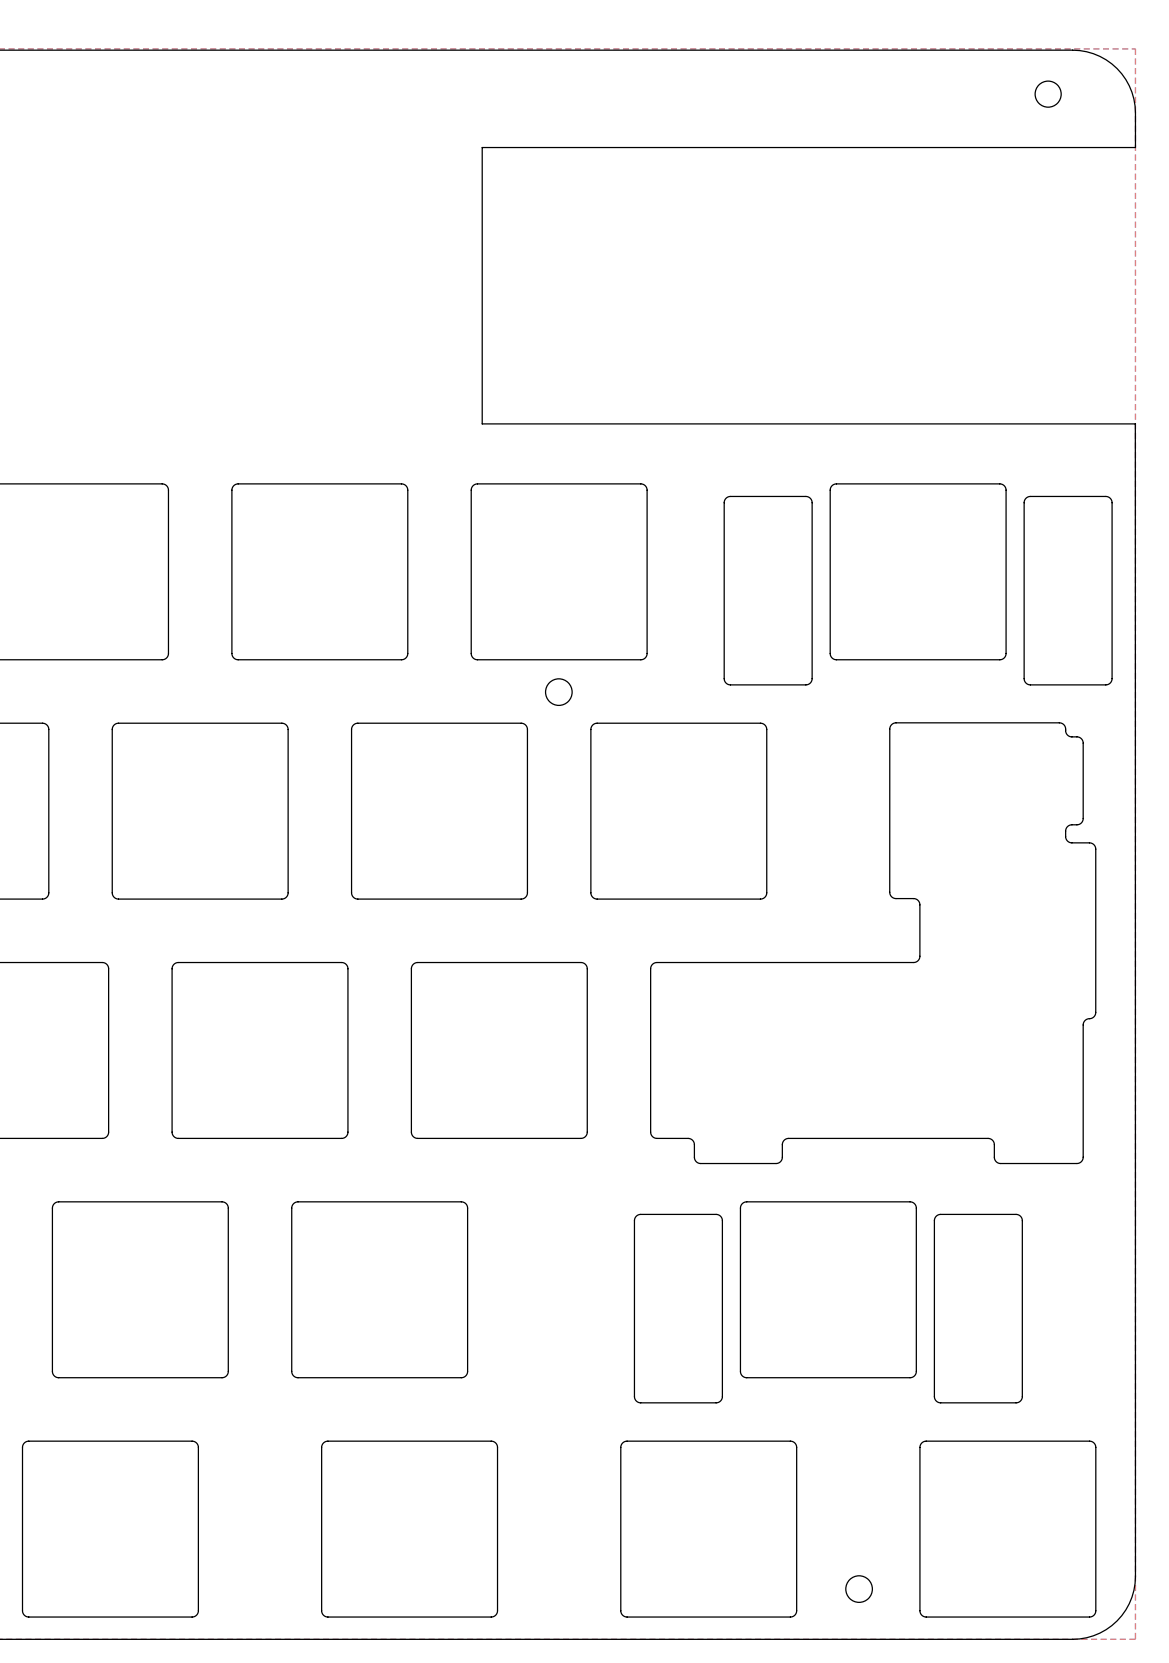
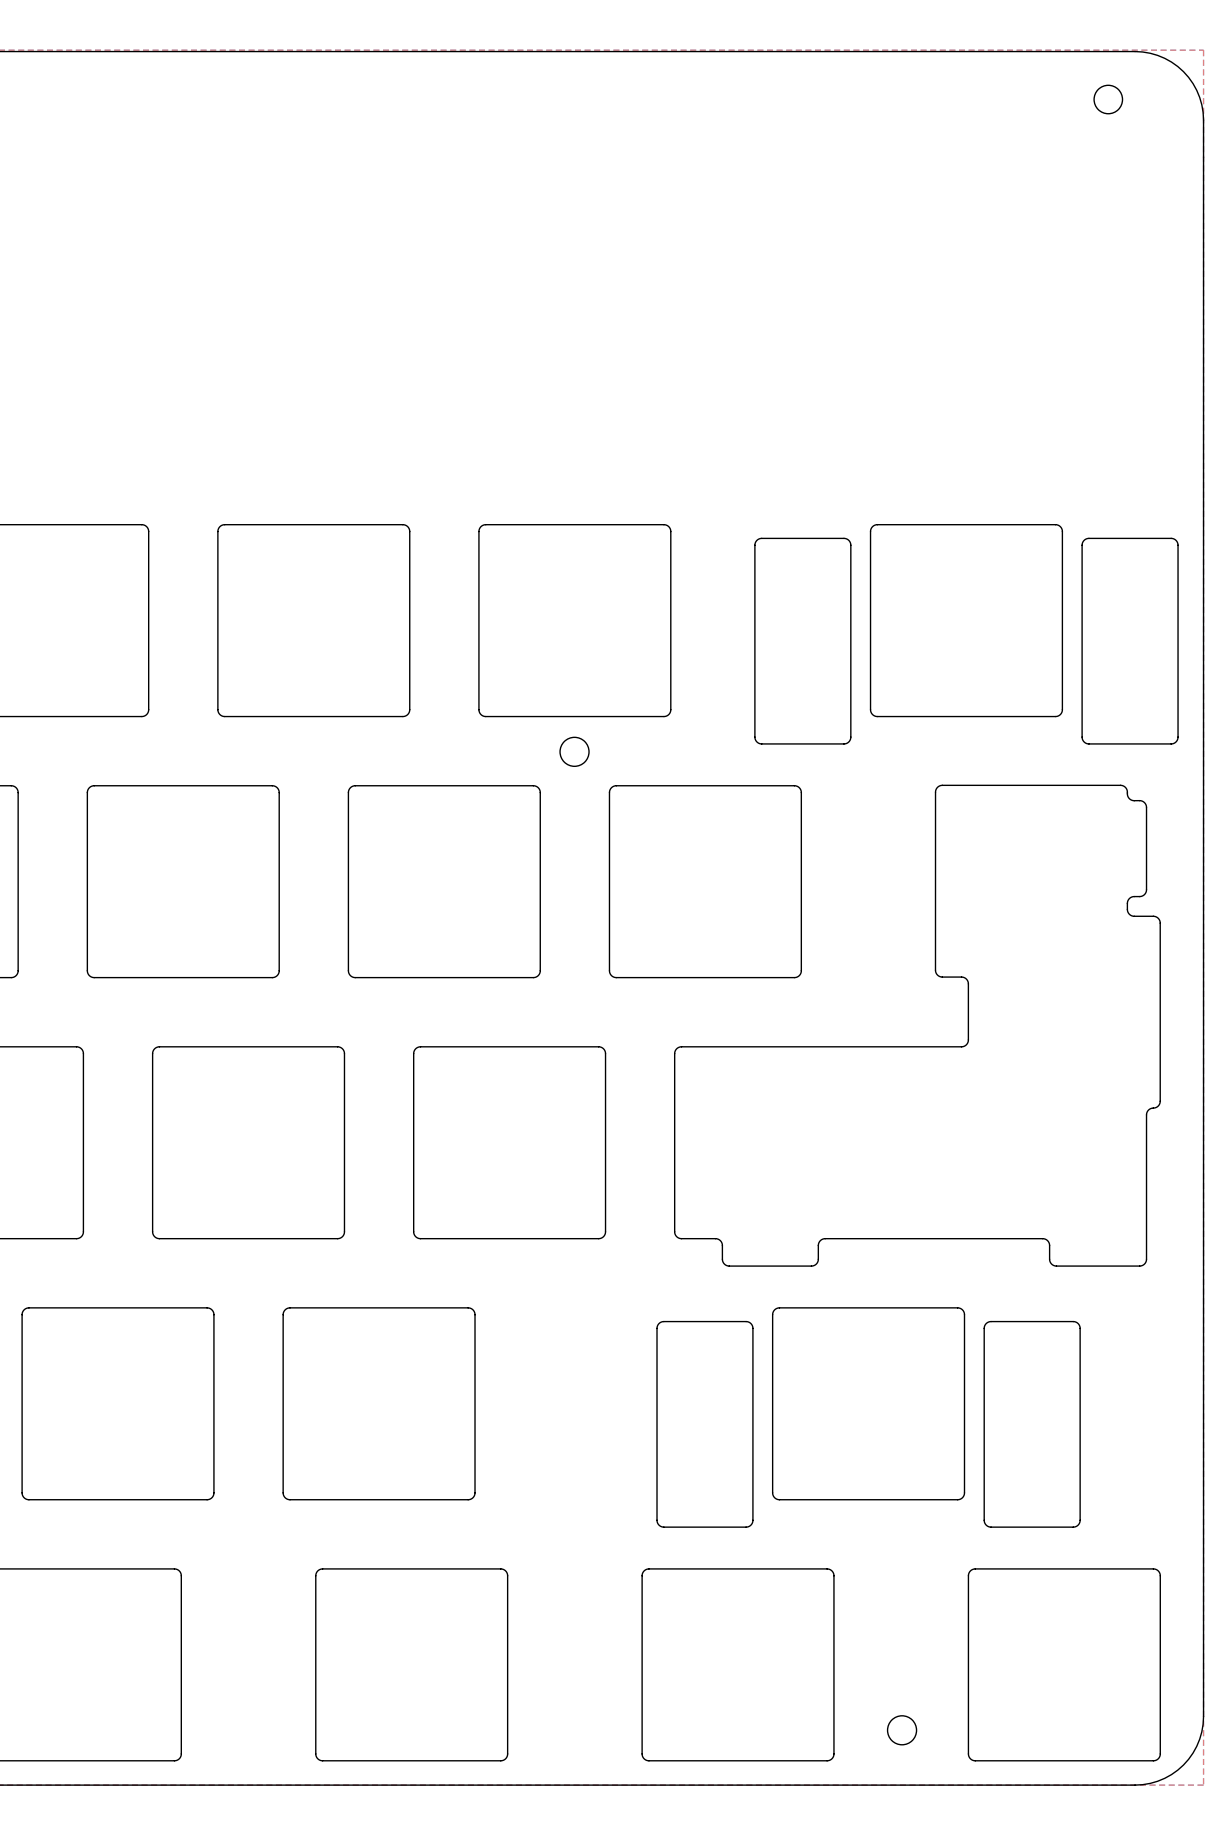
board edge: (1135, 147) (482, 147) (482, 423) (1135, 423) (1135, 1576) -> (1203, 157) (1203, 1716)

